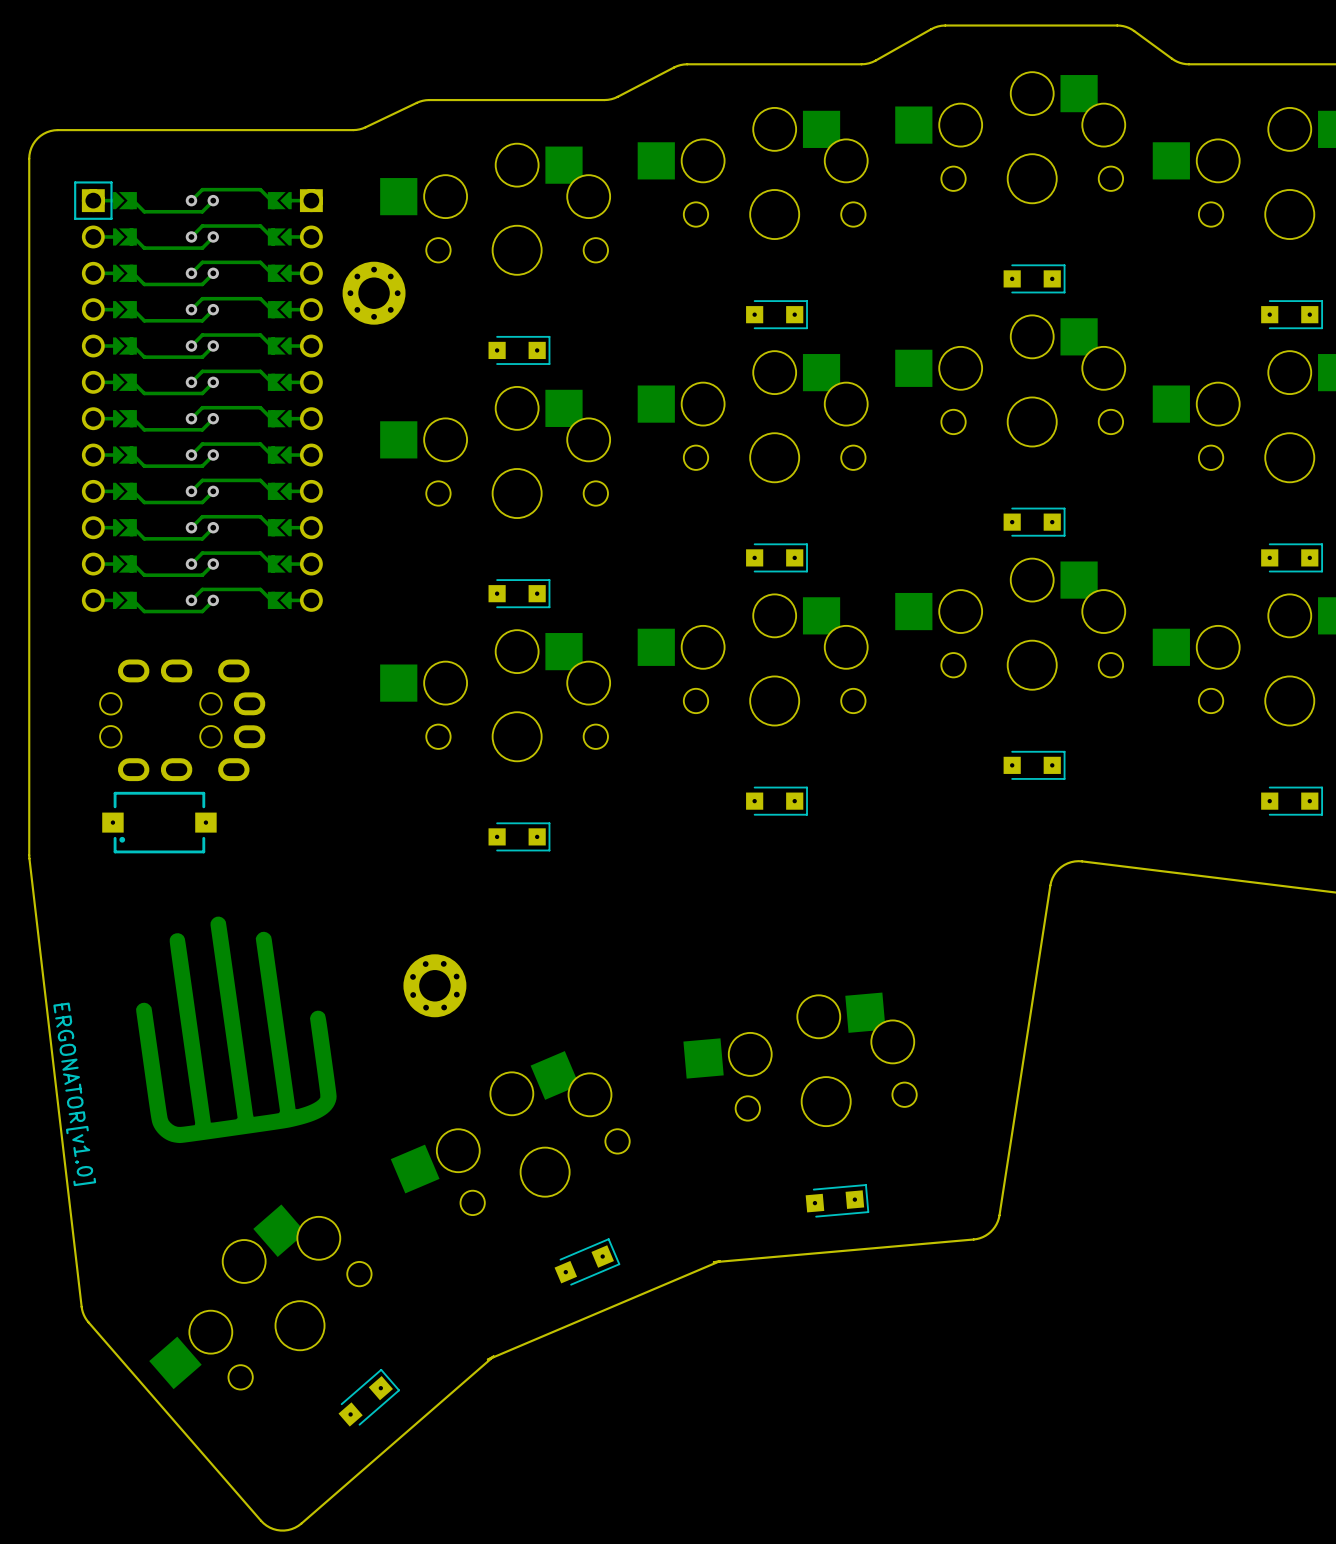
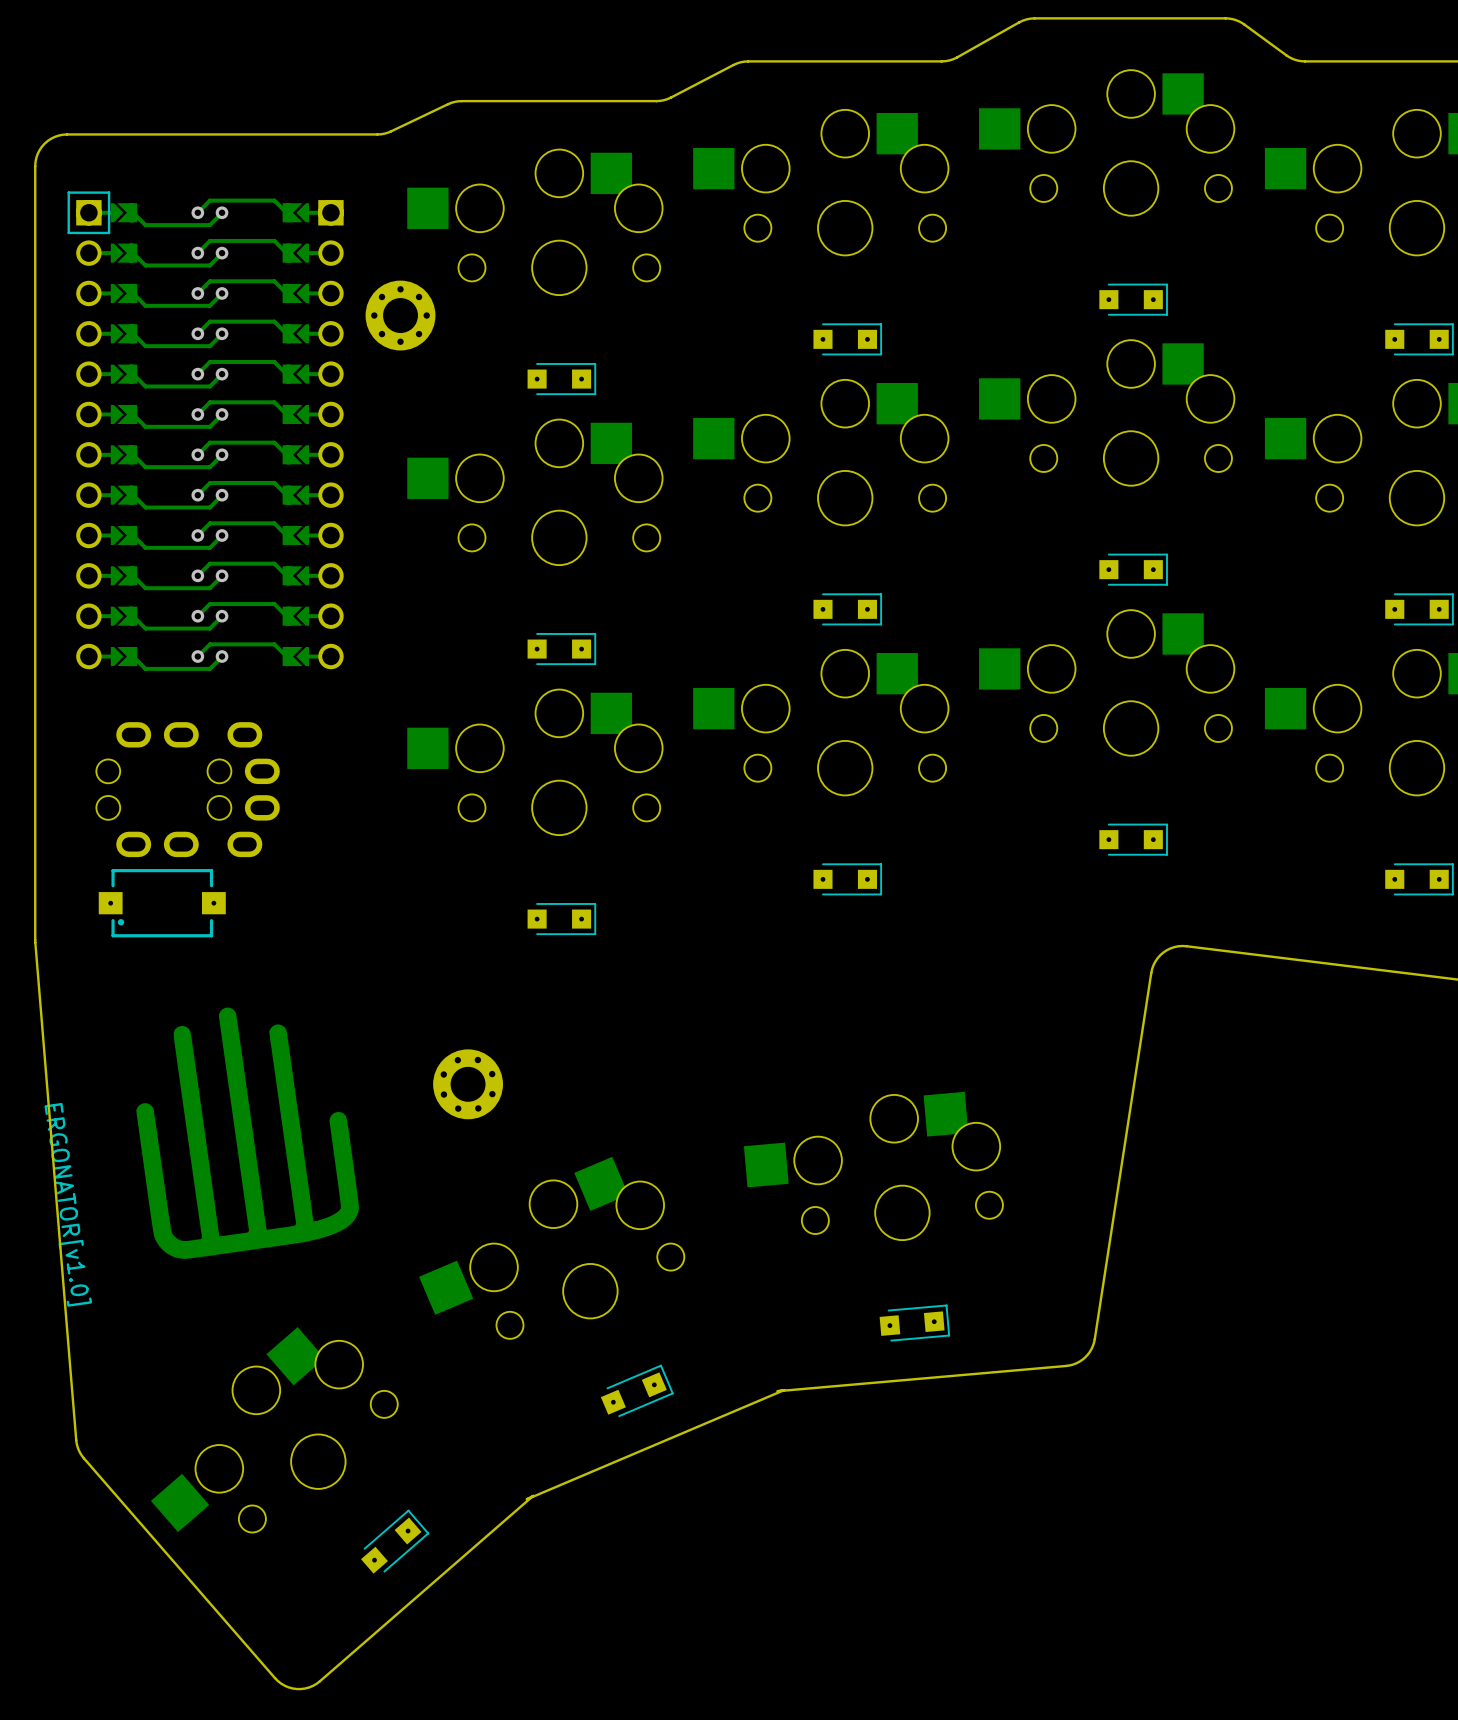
board edge: (73, 130) (54, 130) (43, 133) (33, 144) (29, 158) (29, 855) (81, 1306) (88, 1322) -> (66, 134) (54, 136) (44, 143) (37, 154) (35, 166) (35, 939) (76, 1440) (78, 1449) (83, 1458)

